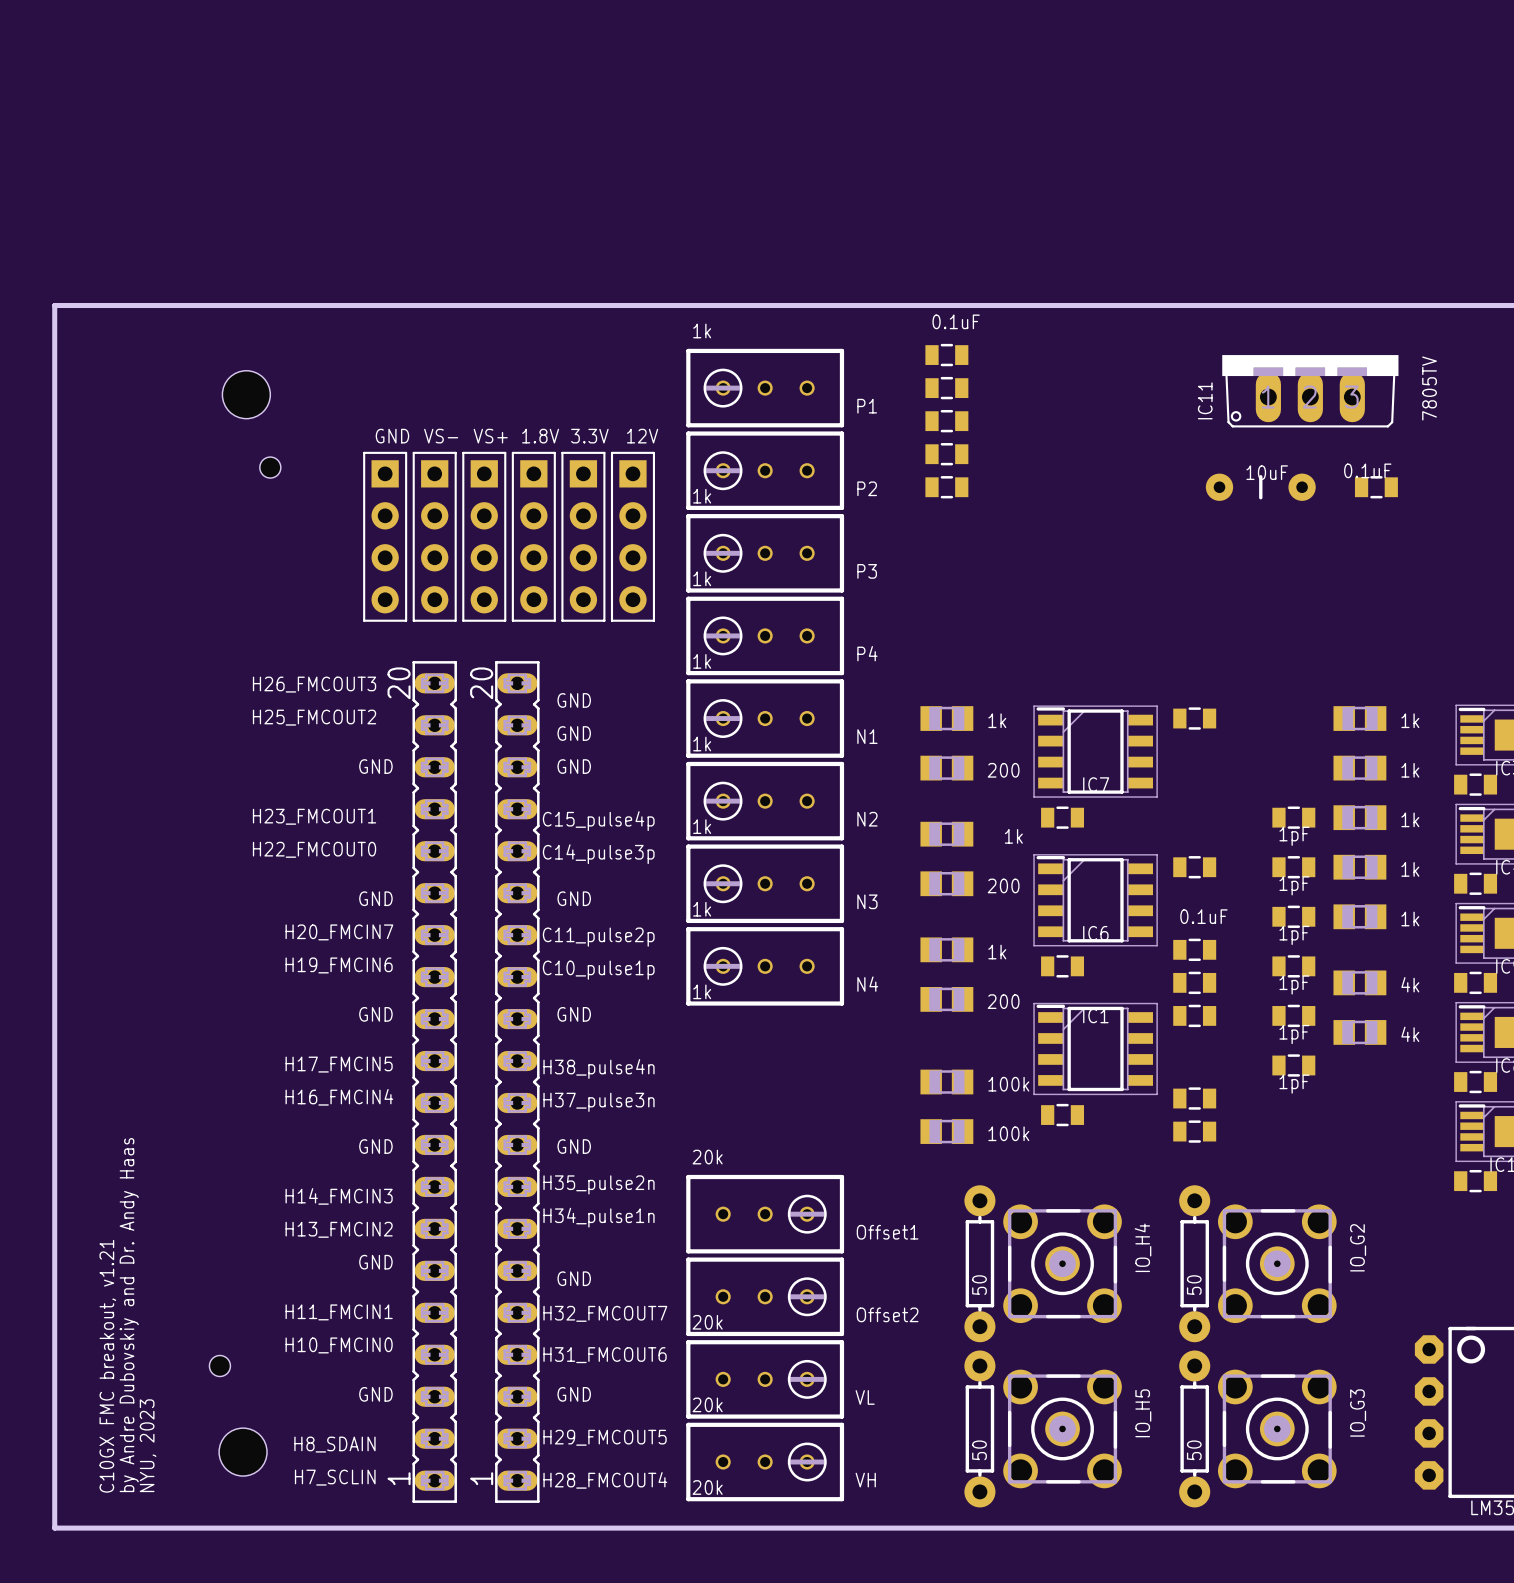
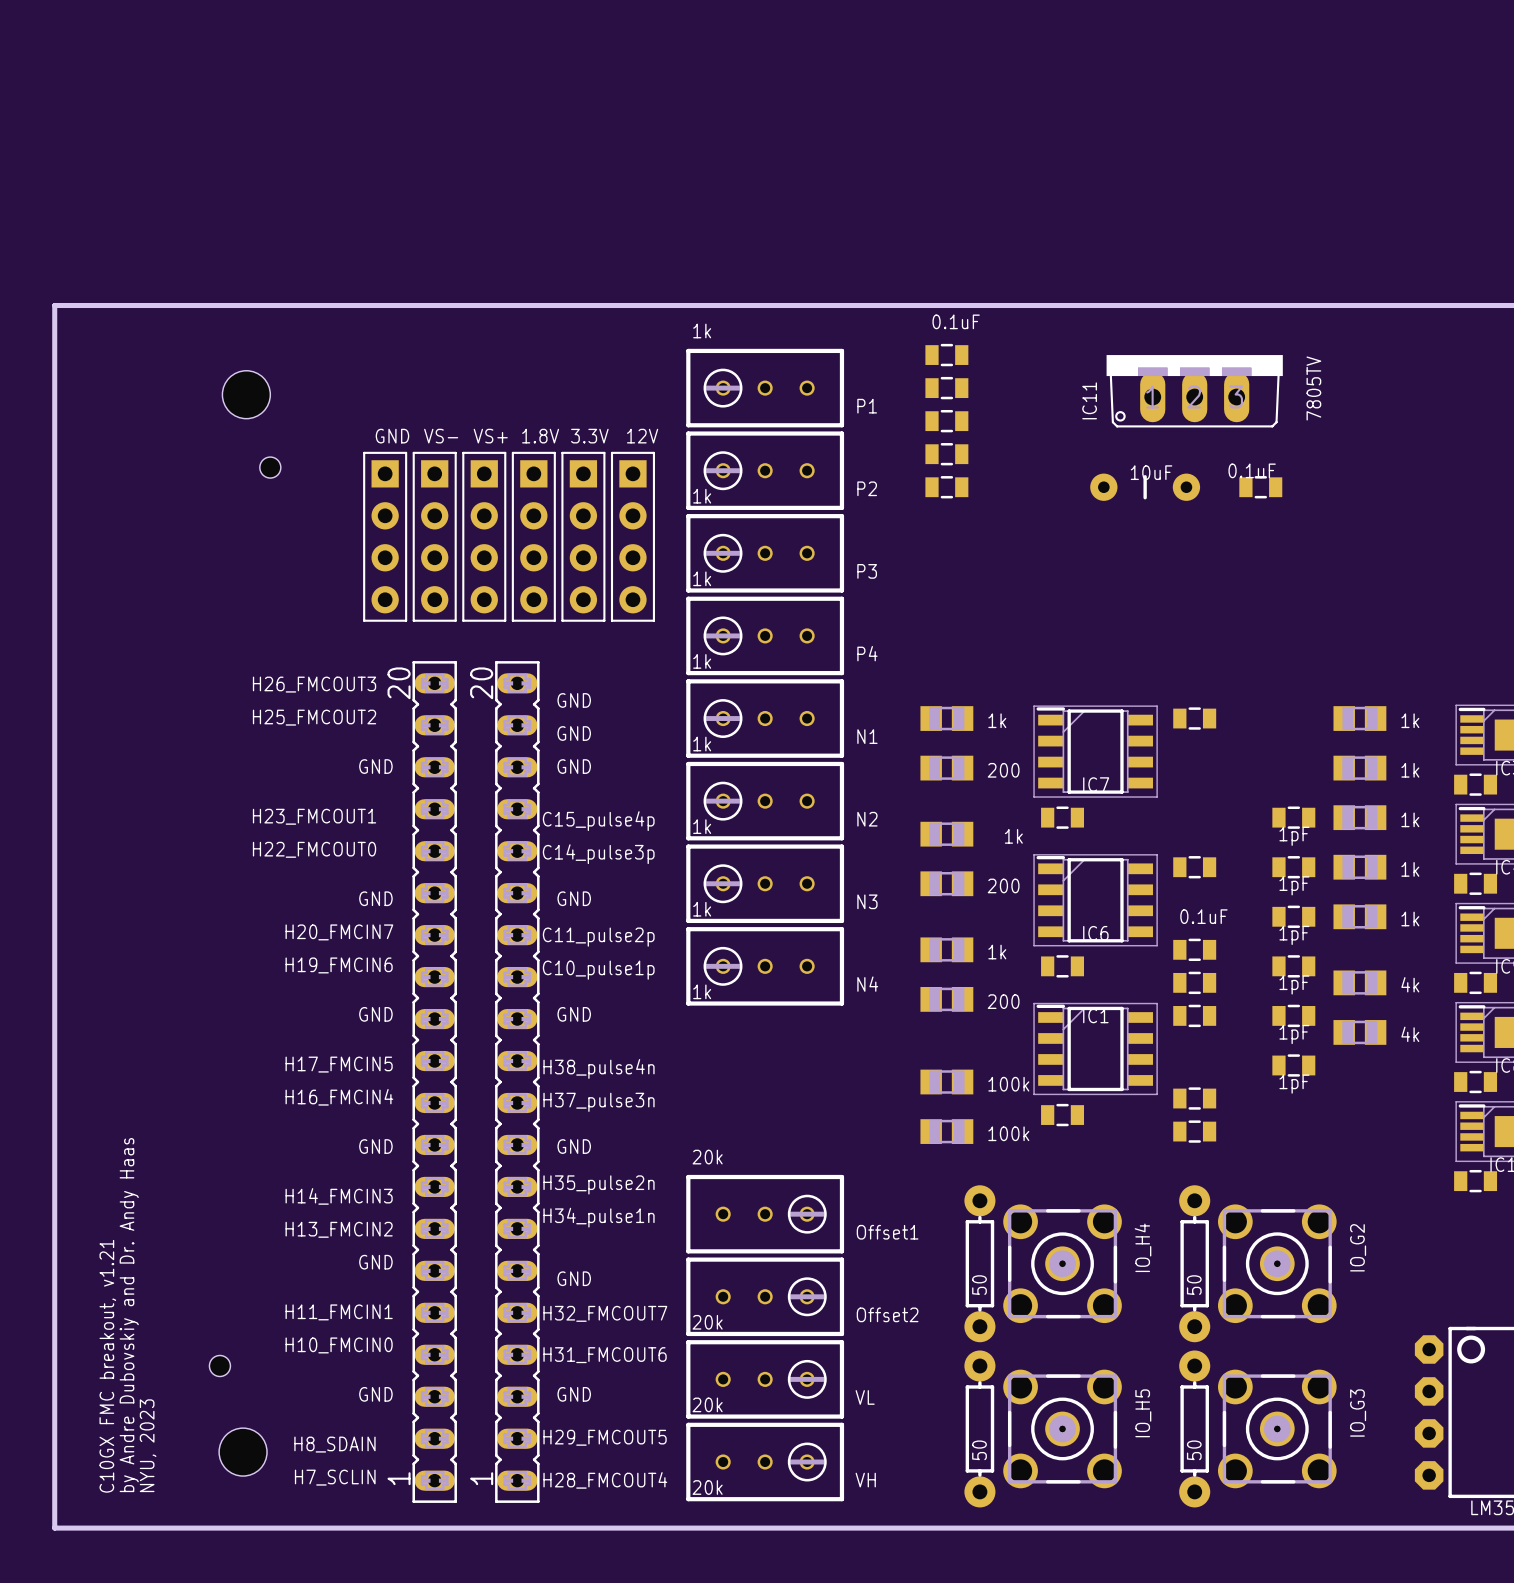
IC11 position: (1310, 391) -> (1194, 391)
part value: 10uF (1267, 472) -> 0.1uF (1252, 470)
part footprint: [1205, 473, 1316, 501] -> [1239, 476, 1283, 499]
part: none -> 10uF (1145, 487)
part: 0.1uF (1376, 487) -> none

